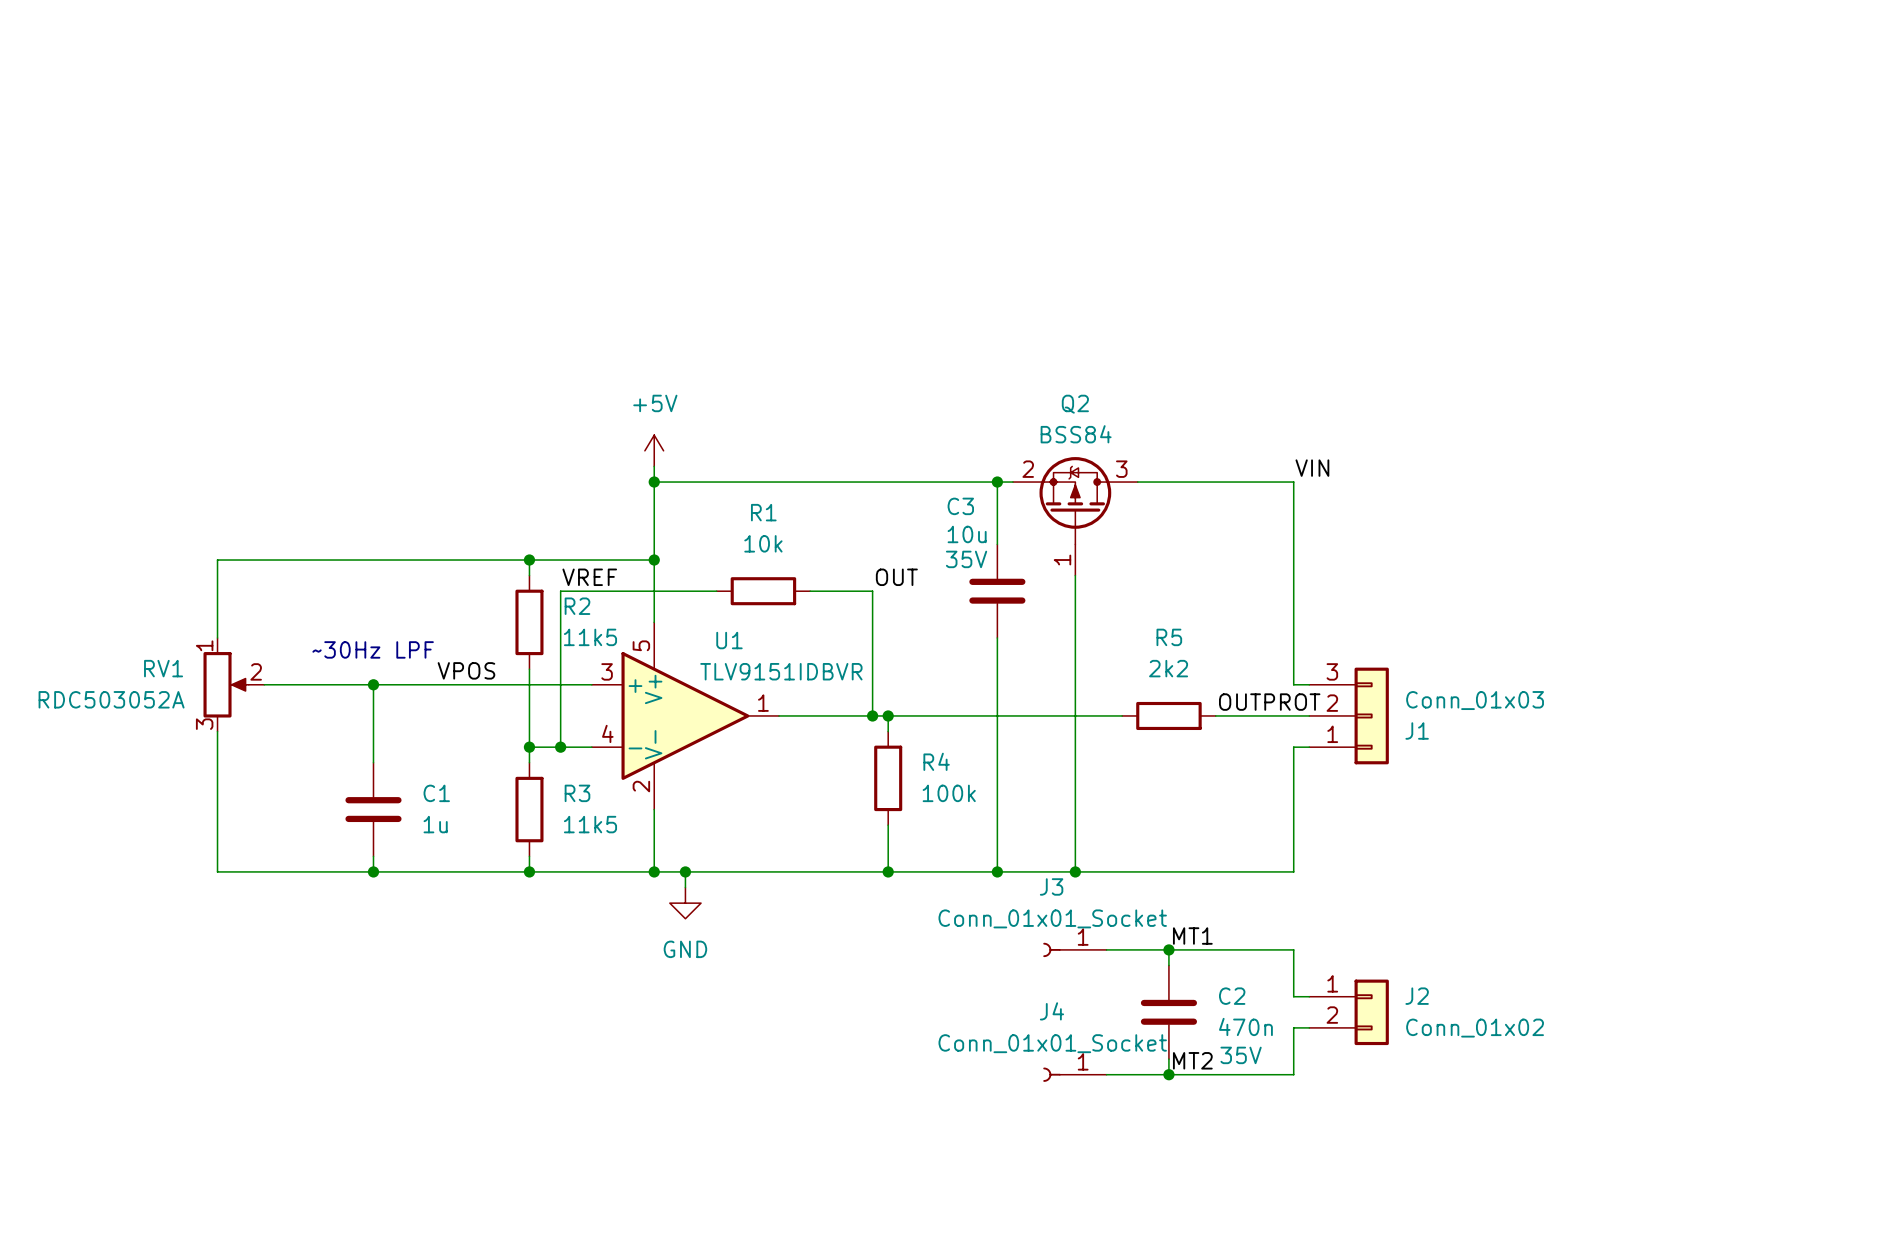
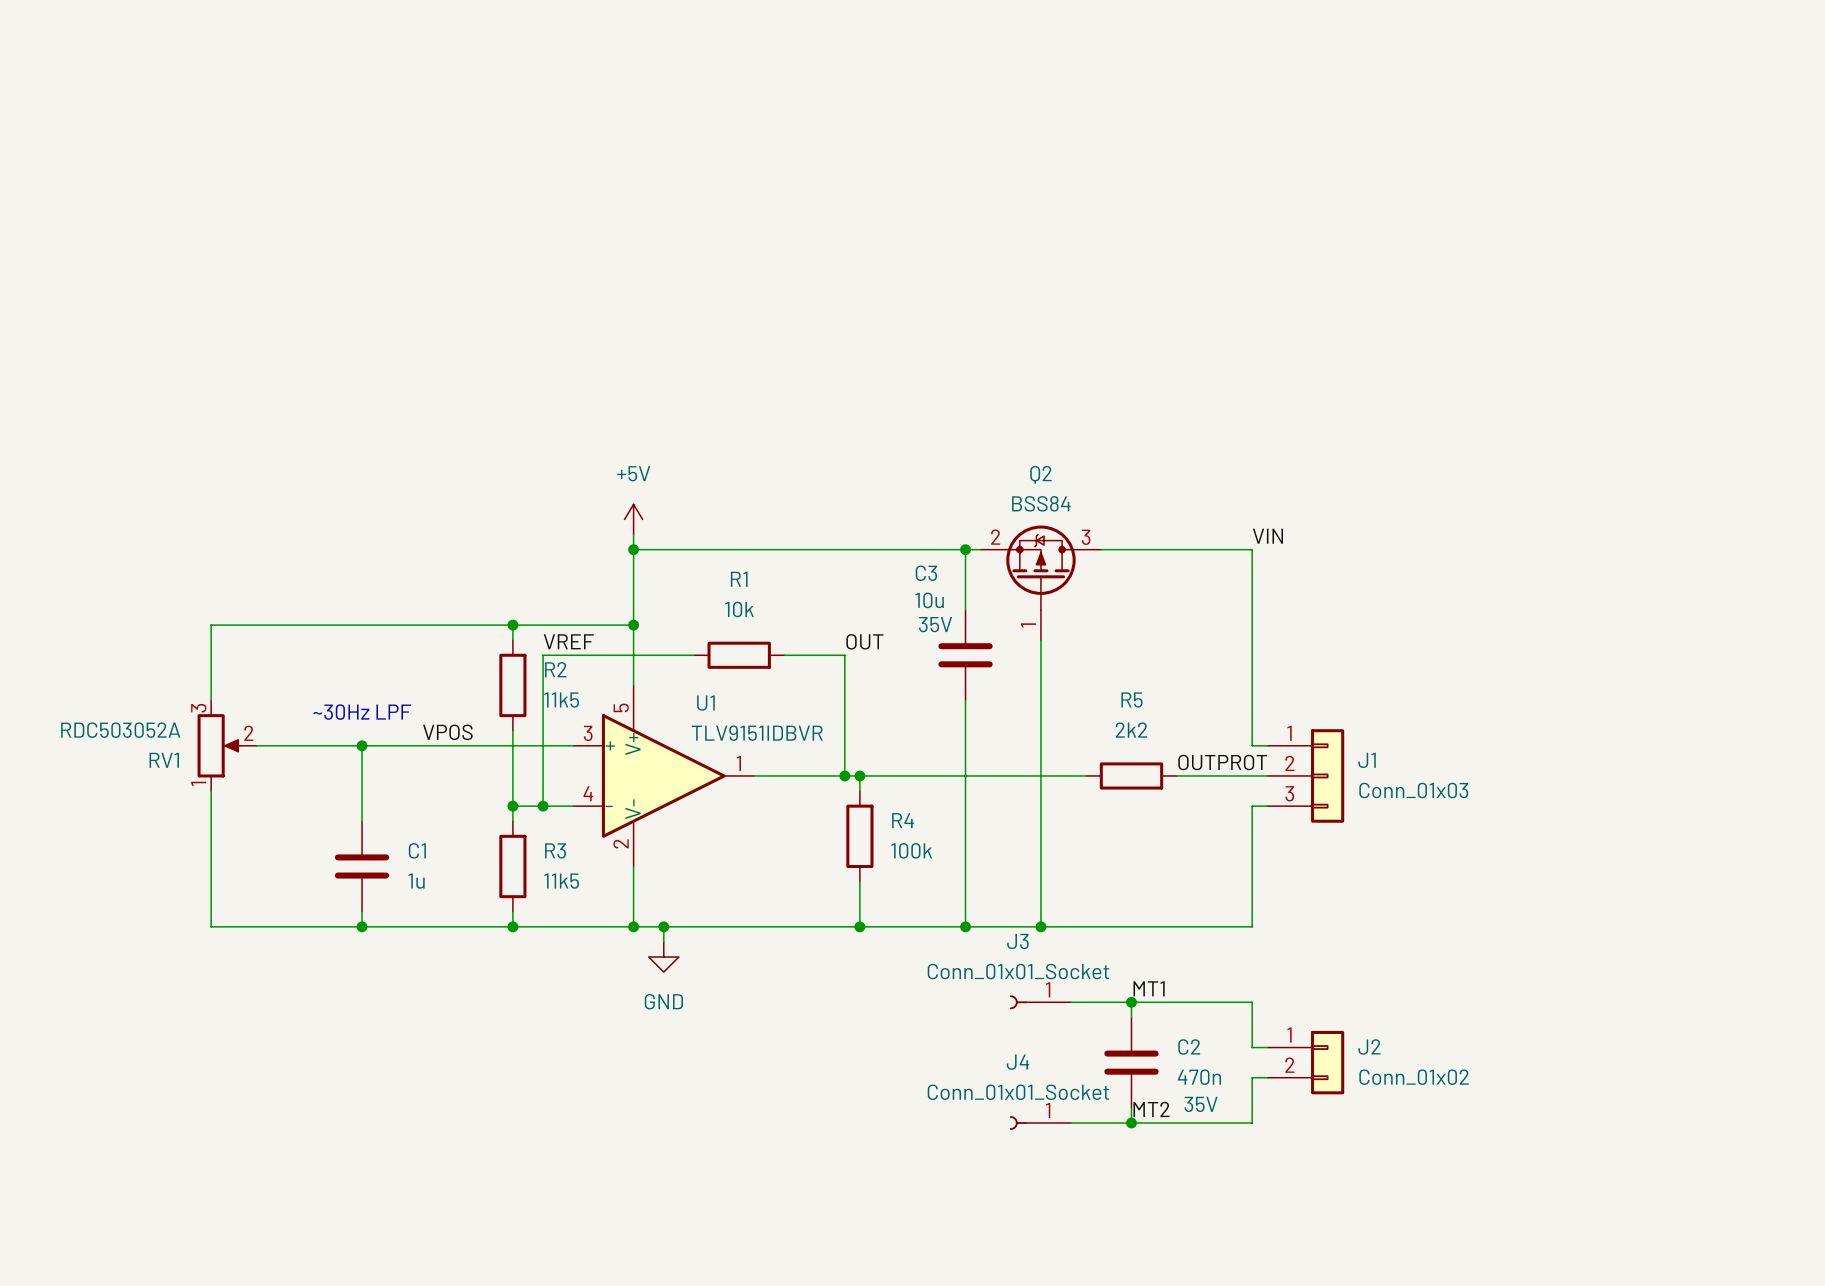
RV1 flip: as is (226, 684) -> up-down (219, 745)
J1 flip: as is (1371, 715) -> up-down (1327, 775)

